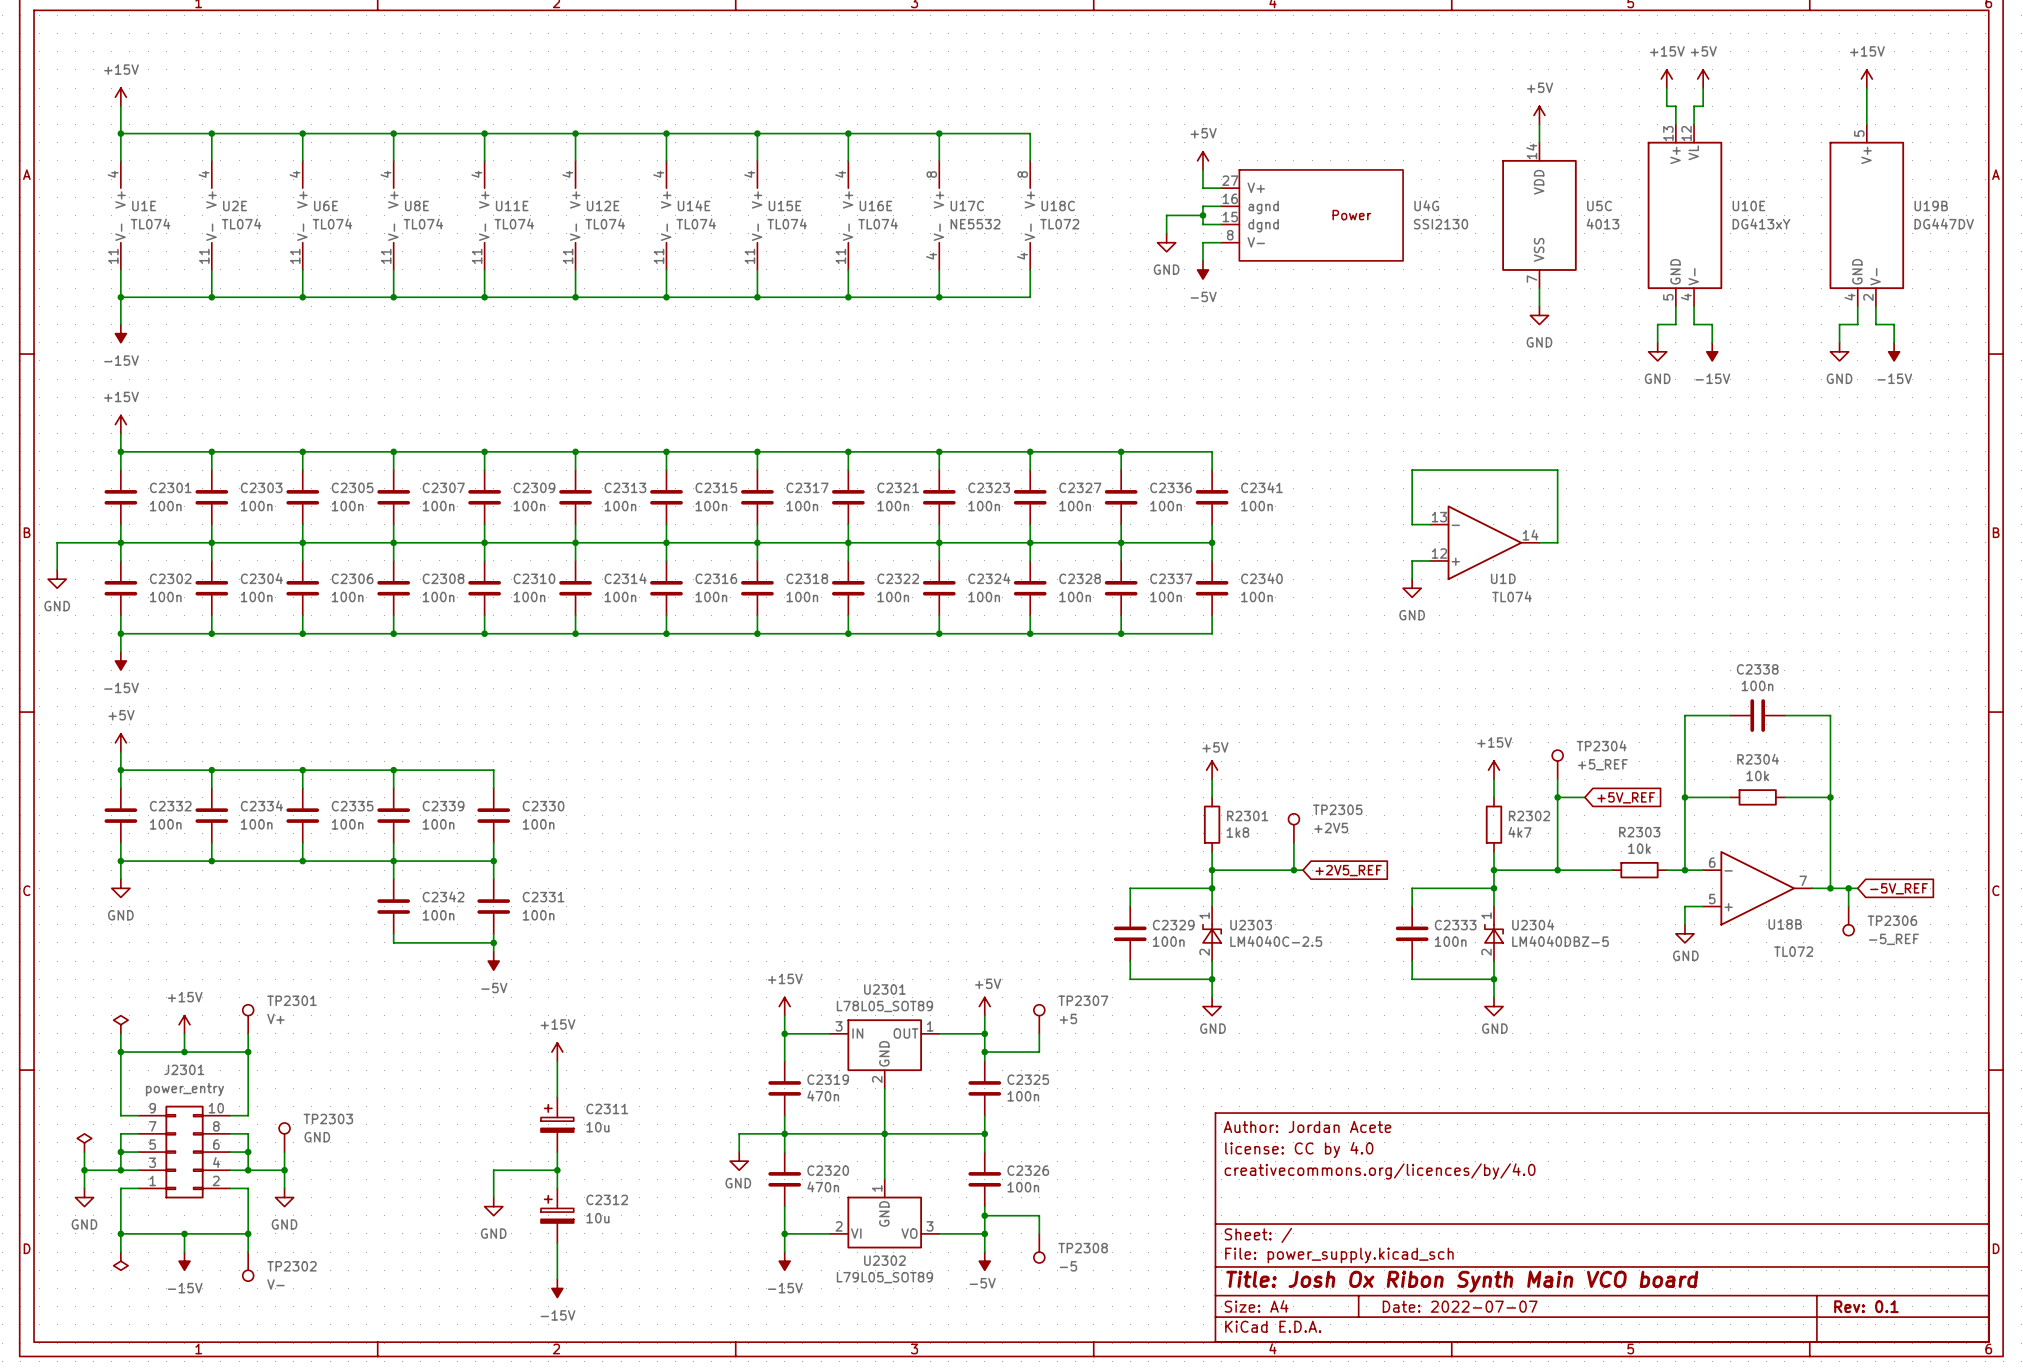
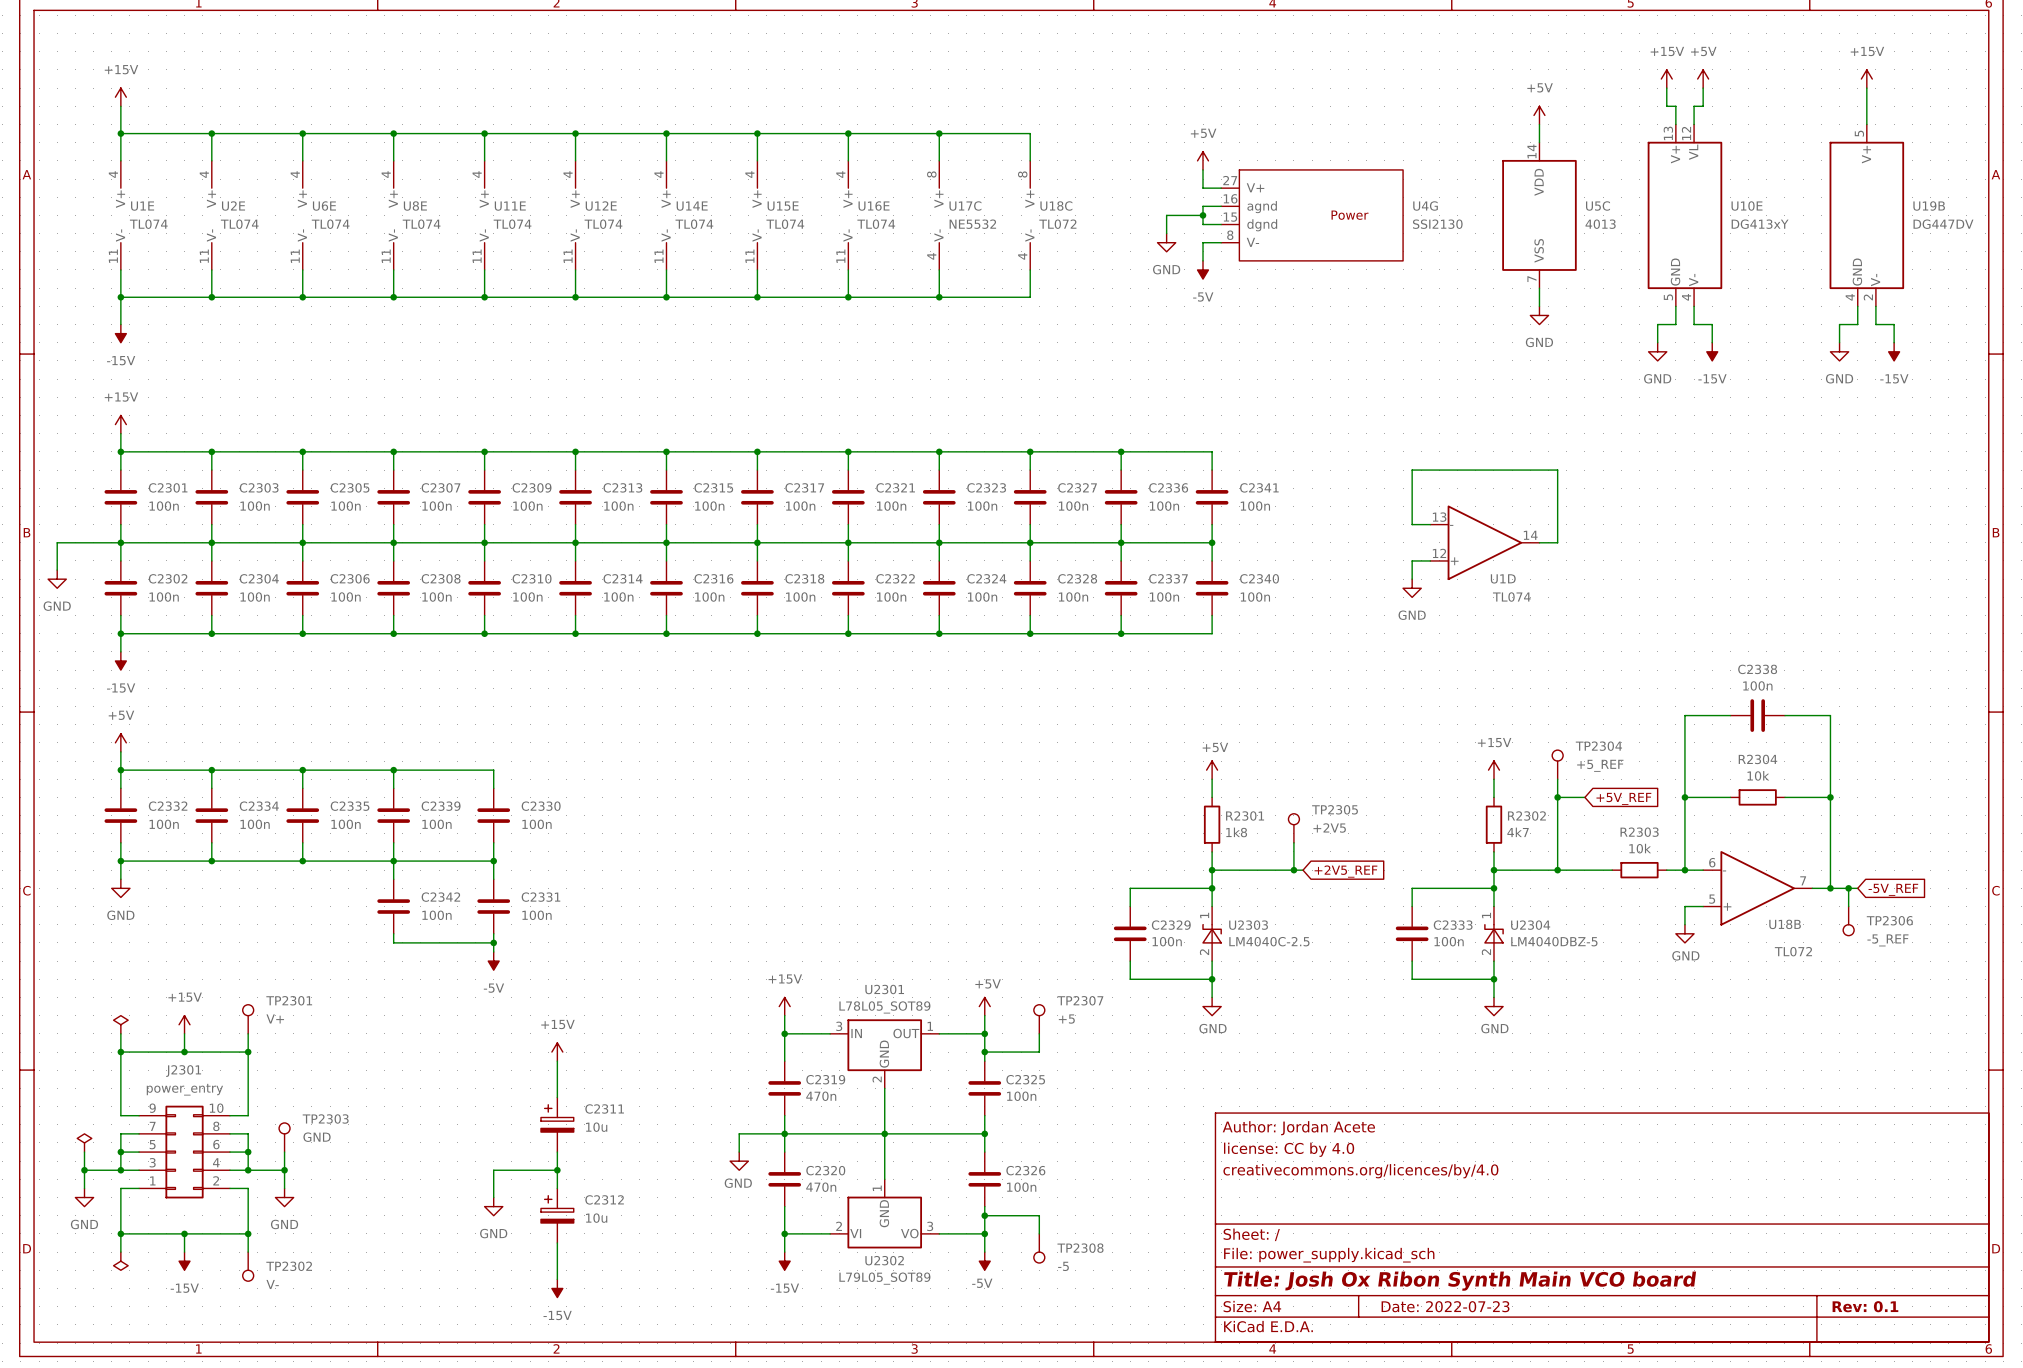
title block: Date: 2022-07-07 (1460, 1306) -> Date: 2022-07-23 (1445, 1306)

